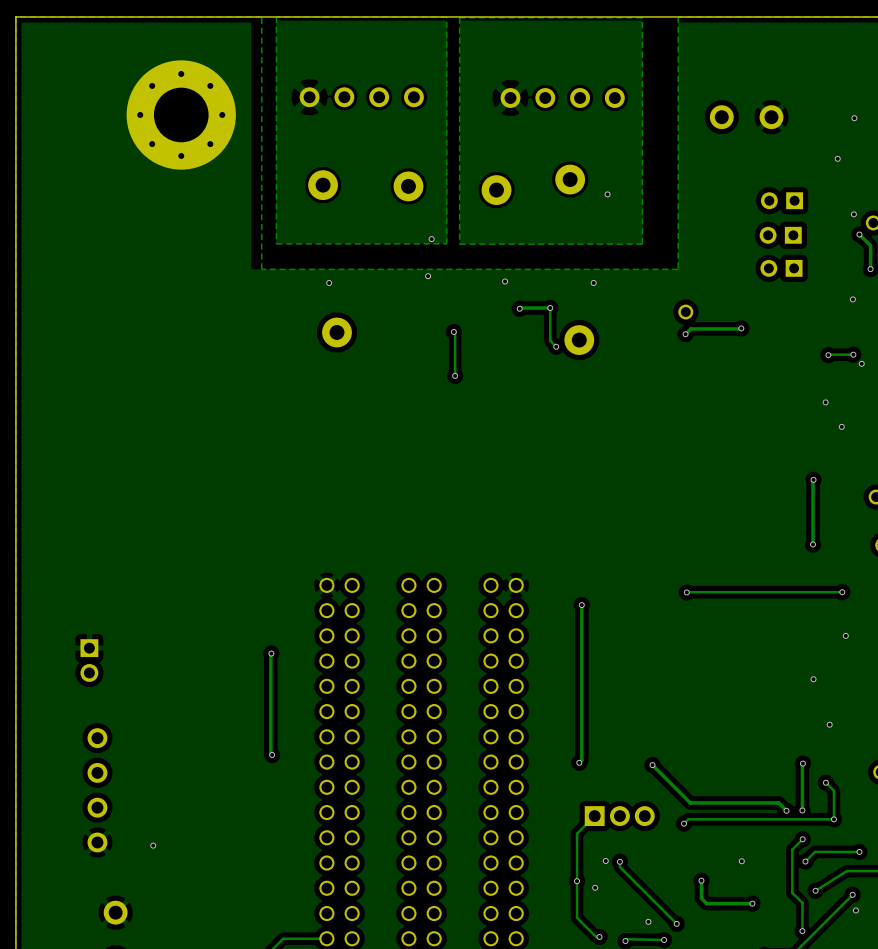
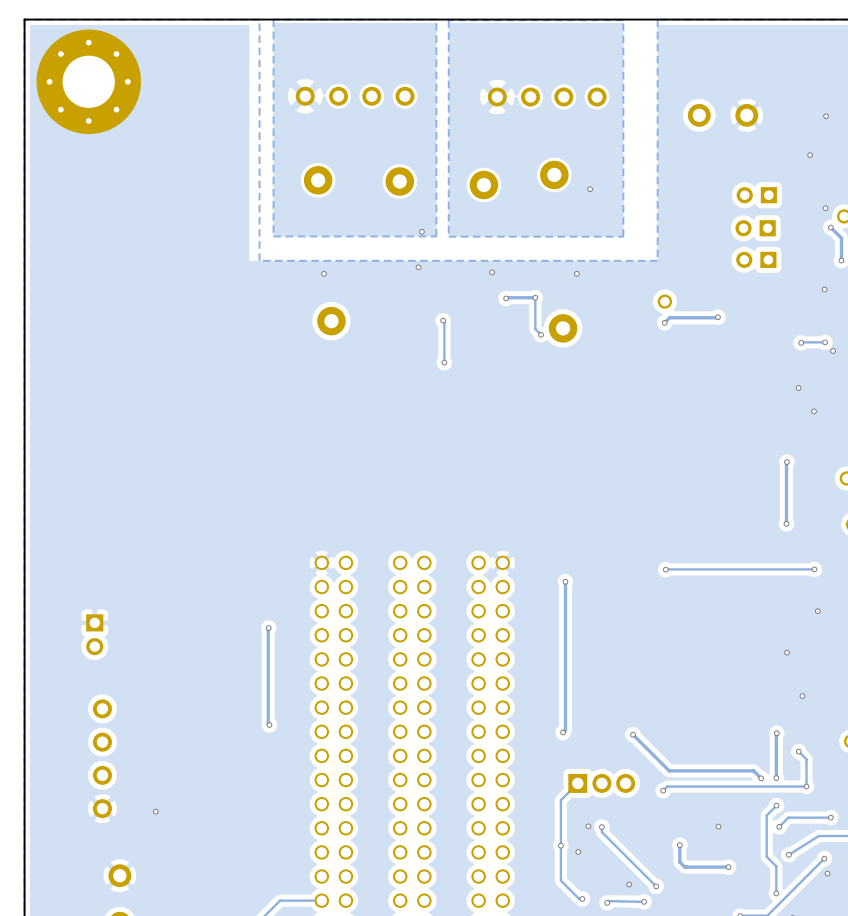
part position: (181, 114) -> (88, 81)

